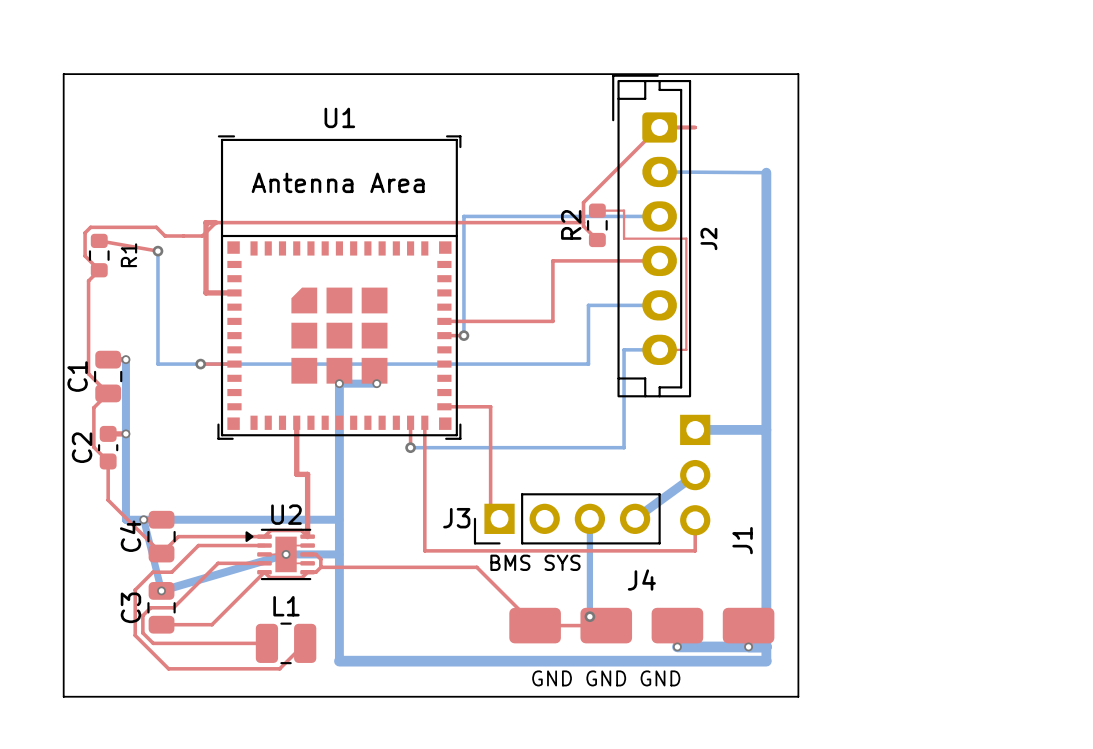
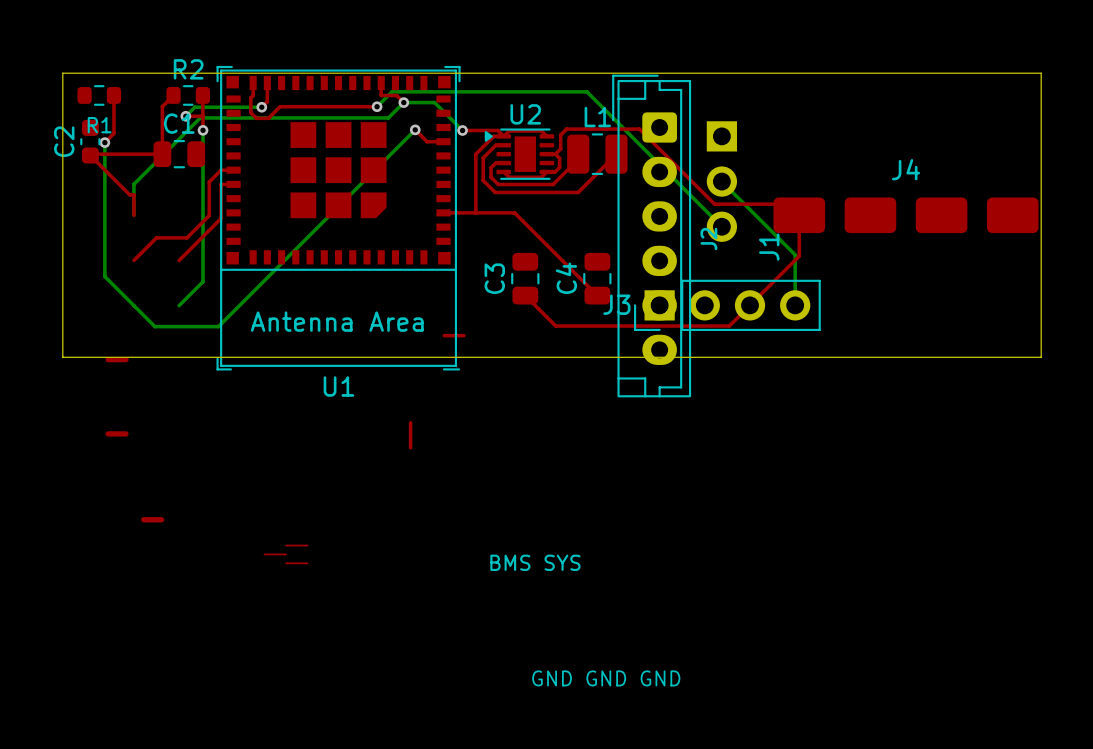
board edge: none -> (62, 73) (1041, 73) (1041, 357) (62, 357) (62, 73)
board edge: (63, 74) (798, 74) (798, 696) (63, 696) (63, 74) -> none
top track: none -> (253, 83) (250, 112) (256, 118) (268, 118) (280, 106) (377, 106)
top track: none -> (267, 83) (267, 101) (261, 107)
top track: none -> (381, 83) (381, 95) (396, 95) (403, 102)
top track: none -> (113, 95) (113, 133) (104, 142)
top track: none -> (173, 95) (162, 106) (162, 154) (90, 155) (129, 194) (133, 194) (133, 215)
top track: none -> (202, 95) (202, 116) (185, 116)
via: none -> (403, 102)
bottom track: none -> (377, 106) (391, 91) (586, 91) (721, 226)
via: none -> (377, 106)
bottom track: none -> (261, 107) (194, 107) (185, 116)
via: none -> (261, 107)
via: none -> (185, 116)
top track: none -> (203, 116) (203, 130)
top track: (695, 127) (658, 127) (583, 202) (583, 226) (597, 240) -> none
top track: none -> (415, 129) (427, 141) (443, 141)
bottom track: none -> (415, 129) (218, 326) (154, 326) (104, 276) (104, 142)
via: none -> (415, 129)
bottom track: none -> (203, 130) (203, 281) (179, 305)
via: none -> (203, 130)
top track: none -> (462, 130) (497, 130) (503, 136)
bottom track: none -> (462, 130) (434, 102) (403, 102) (388, 117) (200, 117) (133, 184) (133, 215)
via: none -> (462, 130)
top track: none -> (503, 136) (509, 131) (541, 131) (546, 136)
top track: none -> (503, 136) (493, 136) (475, 154) (475, 212)
via: none -> (104, 142)
top track: none -> (503, 145) (495, 145) (483, 157) (483, 180) (495, 192) (578, 192) (616, 154)
top track: none -> (578, 154) (578, 159) (553, 184) (498, 184) (491, 177) (491, 167) (495, 163) (503, 163)
top track: none -> (233, 170) (221, 170) (209, 181) (209, 215) (187, 237) (156, 237) (133, 260)
top track: none -> (503, 171) (509, 177) (541, 177) (546, 171) (555, 171) (559, 167) (559, 158) (555, 154) (560, 148) (560, 135) (566, 129) (639, 129) (714, 204) (788, 204) (799, 215) (799, 256) (729, 326) (555, 326) (525, 295)
bottom track: (659, 171) (766, 172) (766, 661) (339, 661) (339, 383) (376, 383) -> none
bottom track: none -> (721, 181) (795, 254) (795, 305)
top track: none -> (233, 184) (221, 184) (221, 218) (179, 260)
top track: (597, 210) (624, 210) (624, 238) (686, 238) (686, 349) (659, 349) -> none
top track: none -> (443, 212) (514, 212) (597, 295)
bottom track: (659, 216) (463, 216) (463, 335) -> none
top track: (215, 222) (206, 222) (206, 292) (234, 292) -> none
top track: (215, 222) (583, 222) -> none
top track: (215, 222) (202, 236) (165, 236) (156, 227) (90, 227) (85, 232) (85, 256) (99, 270) (88, 280) (88, 373) (108, 393) (93, 407) (93, 447) (108, 461) (108, 500) (161, 553) (178, 536) (264, 536) (270, 530) (301, 530) (307, 536) (307, 474) (296, 474) (296, 422) -> none
R2 rotation: 0° (597, 225) -> 90° clockwise (188, 95)
R2 position: (597, 225) -> (188, 95)
top track: (99, 240) (157, 251) -> none
bottom track: (157, 251) (157, 364) (588, 364) (588, 305) (659, 305) -> none
via: (157, 251) -> none
R1 rotation: 0° (99, 255) -> 90° clockwise (99, 95)
R1 position: (99, 255) -> (99, 95)
top track: (659, 260) (552, 260) (552, 321) (444, 321) -> none
U1 rotation: 0° (339, 287) -> 180° (338, 218)
via: (463, 335) -> none
bottom track: (659, 349) (624, 349) (624, 447) (410, 447) -> none
bottom track: (125, 359) (125, 519) -> none
via: (125, 359) -> none
top track: (200, 364) (234, 364) -> none
via: (200, 364) -> none
C1 rotation: 0° (108, 376) -> 90° clockwise (179, 154)
C1 position: (108, 376) -> (179, 154)
via: (339, 383) -> none
via: (376, 383) -> none
top track: (444, 406) (490, 406) (490, 518) (499, 518) -> none
top track: (424, 422) (424, 550) (695, 550) (695, 520) -> none
bottom track: (695, 429) (766, 429) -> none
via: (125, 433) -> none
C2 position: (108, 447) -> (90, 141)
via: (410, 447) -> none
bottom track: (695, 475) (635, 518) -> none
J1 position: (695, 475) -> (721, 181)
J3 position: (567, 518) -> (727, 305)
bottom track: (589, 518) (589, 616) -> none
bottom track: (125, 519) (339, 519) -> none
bottom track: (125, 519) (143, 519) (161, 590) (286, 554) (339, 554) -> none
via: (143, 519) -> none
C4 position: (161, 536) -> (597, 278)
top track: (264, 545) (198, 545) (171, 572) (152, 572) (135, 589) (135, 635) (168, 668) (279, 668) (305, 643) -> none
U2 position: (280, 554) -> (519, 154)
via: (286, 554) -> none
top track: (307, 554) (315, 554) (320, 559) (320, 567) -> none
top track: (264, 563) (218, 563) (173, 607) (150, 607) (142, 615) (142, 633) (153, 643) (266, 643) -> none
top track: (320, 567) (476, 567) (535, 625) (606, 625) (589, 616) -> none
top track: (320, 567) (315, 572) (307, 572) (302, 577) (269, 577) (264, 572) (212, 624) (161, 624) -> none
via: (161, 590) -> none
C3 position: (161, 607) -> (525, 278)
via: (589, 616) -> none
J4 position: (641, 625) -> (906, 215)
L1 position: (286, 643) -> (597, 154)
bottom track: (677, 646) (766, 646) -> none
via: (677, 646) -> none
via: (748, 646) -> none

